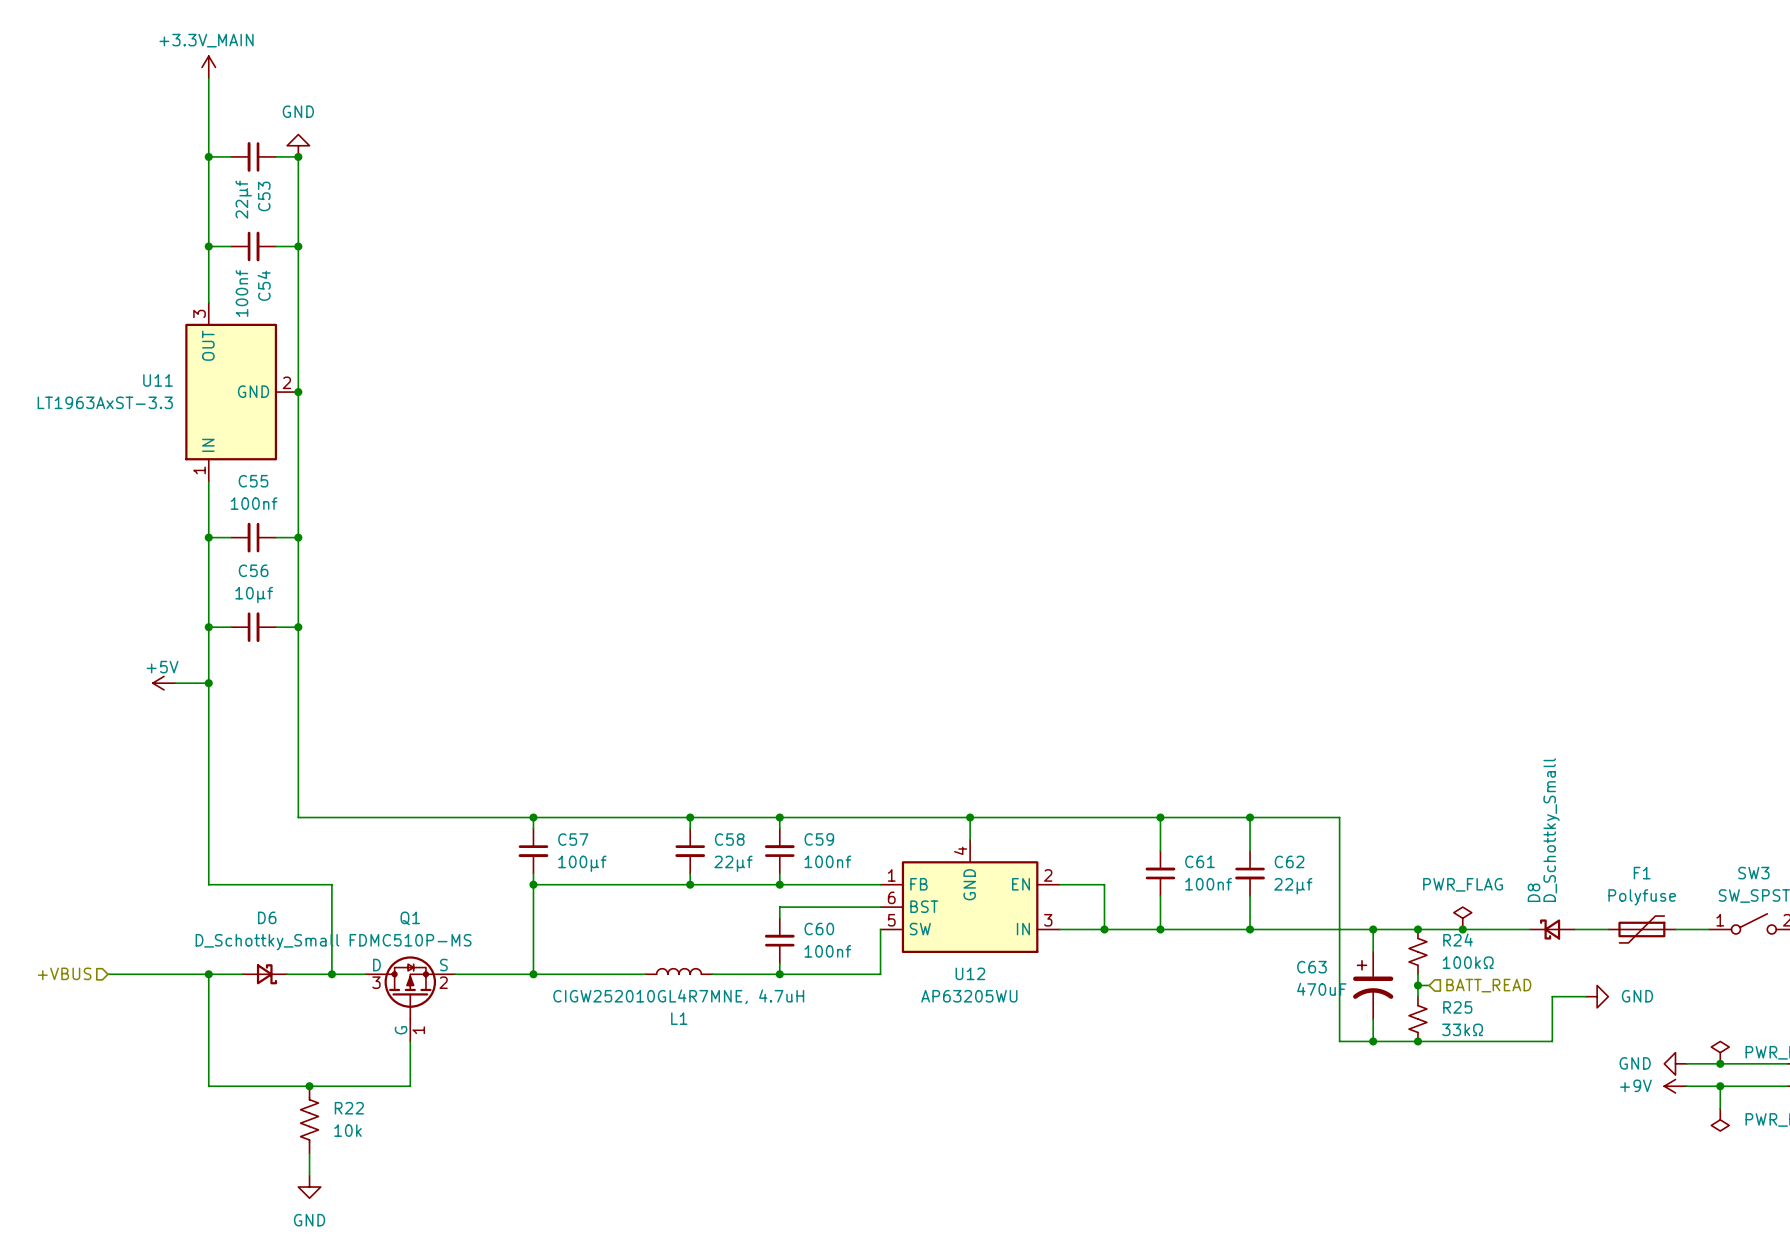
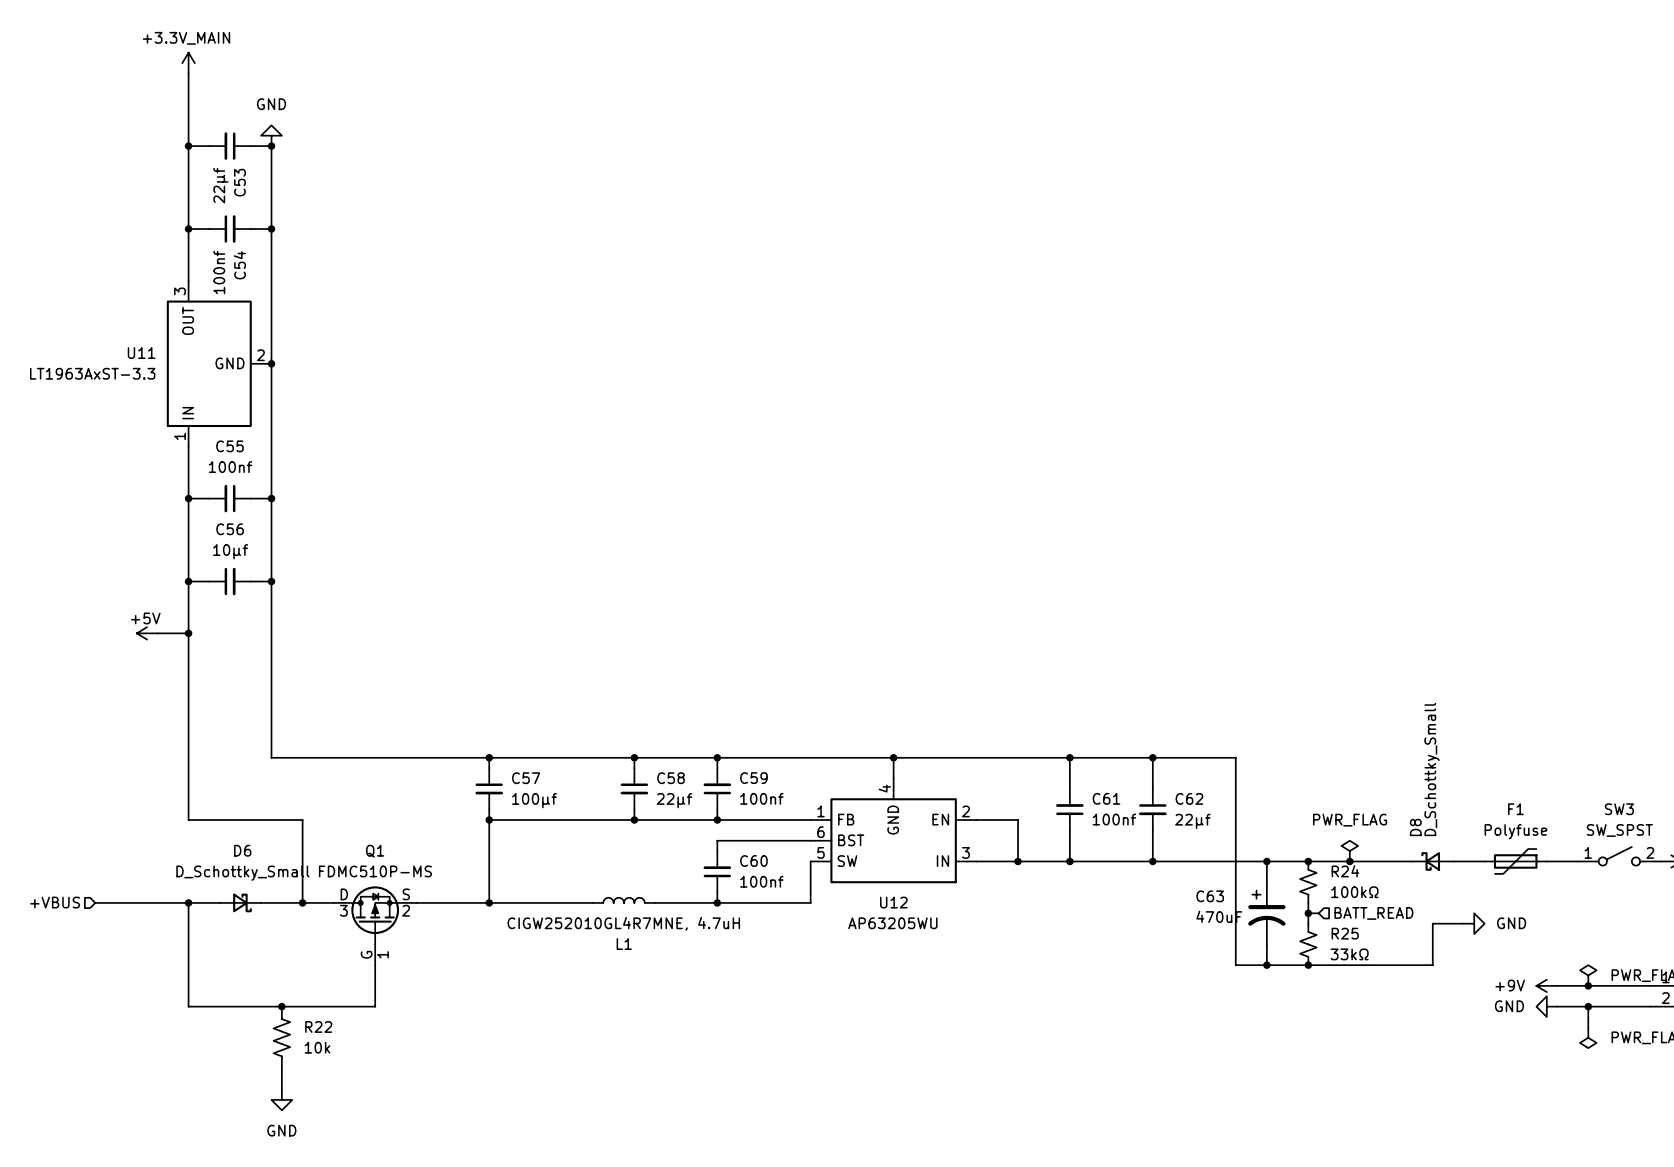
power symbol: GND (1675, 1063) -> +9V (1546, 985)
power symbol: +9V (1675, 1086) -> GND (1546, 1006)

